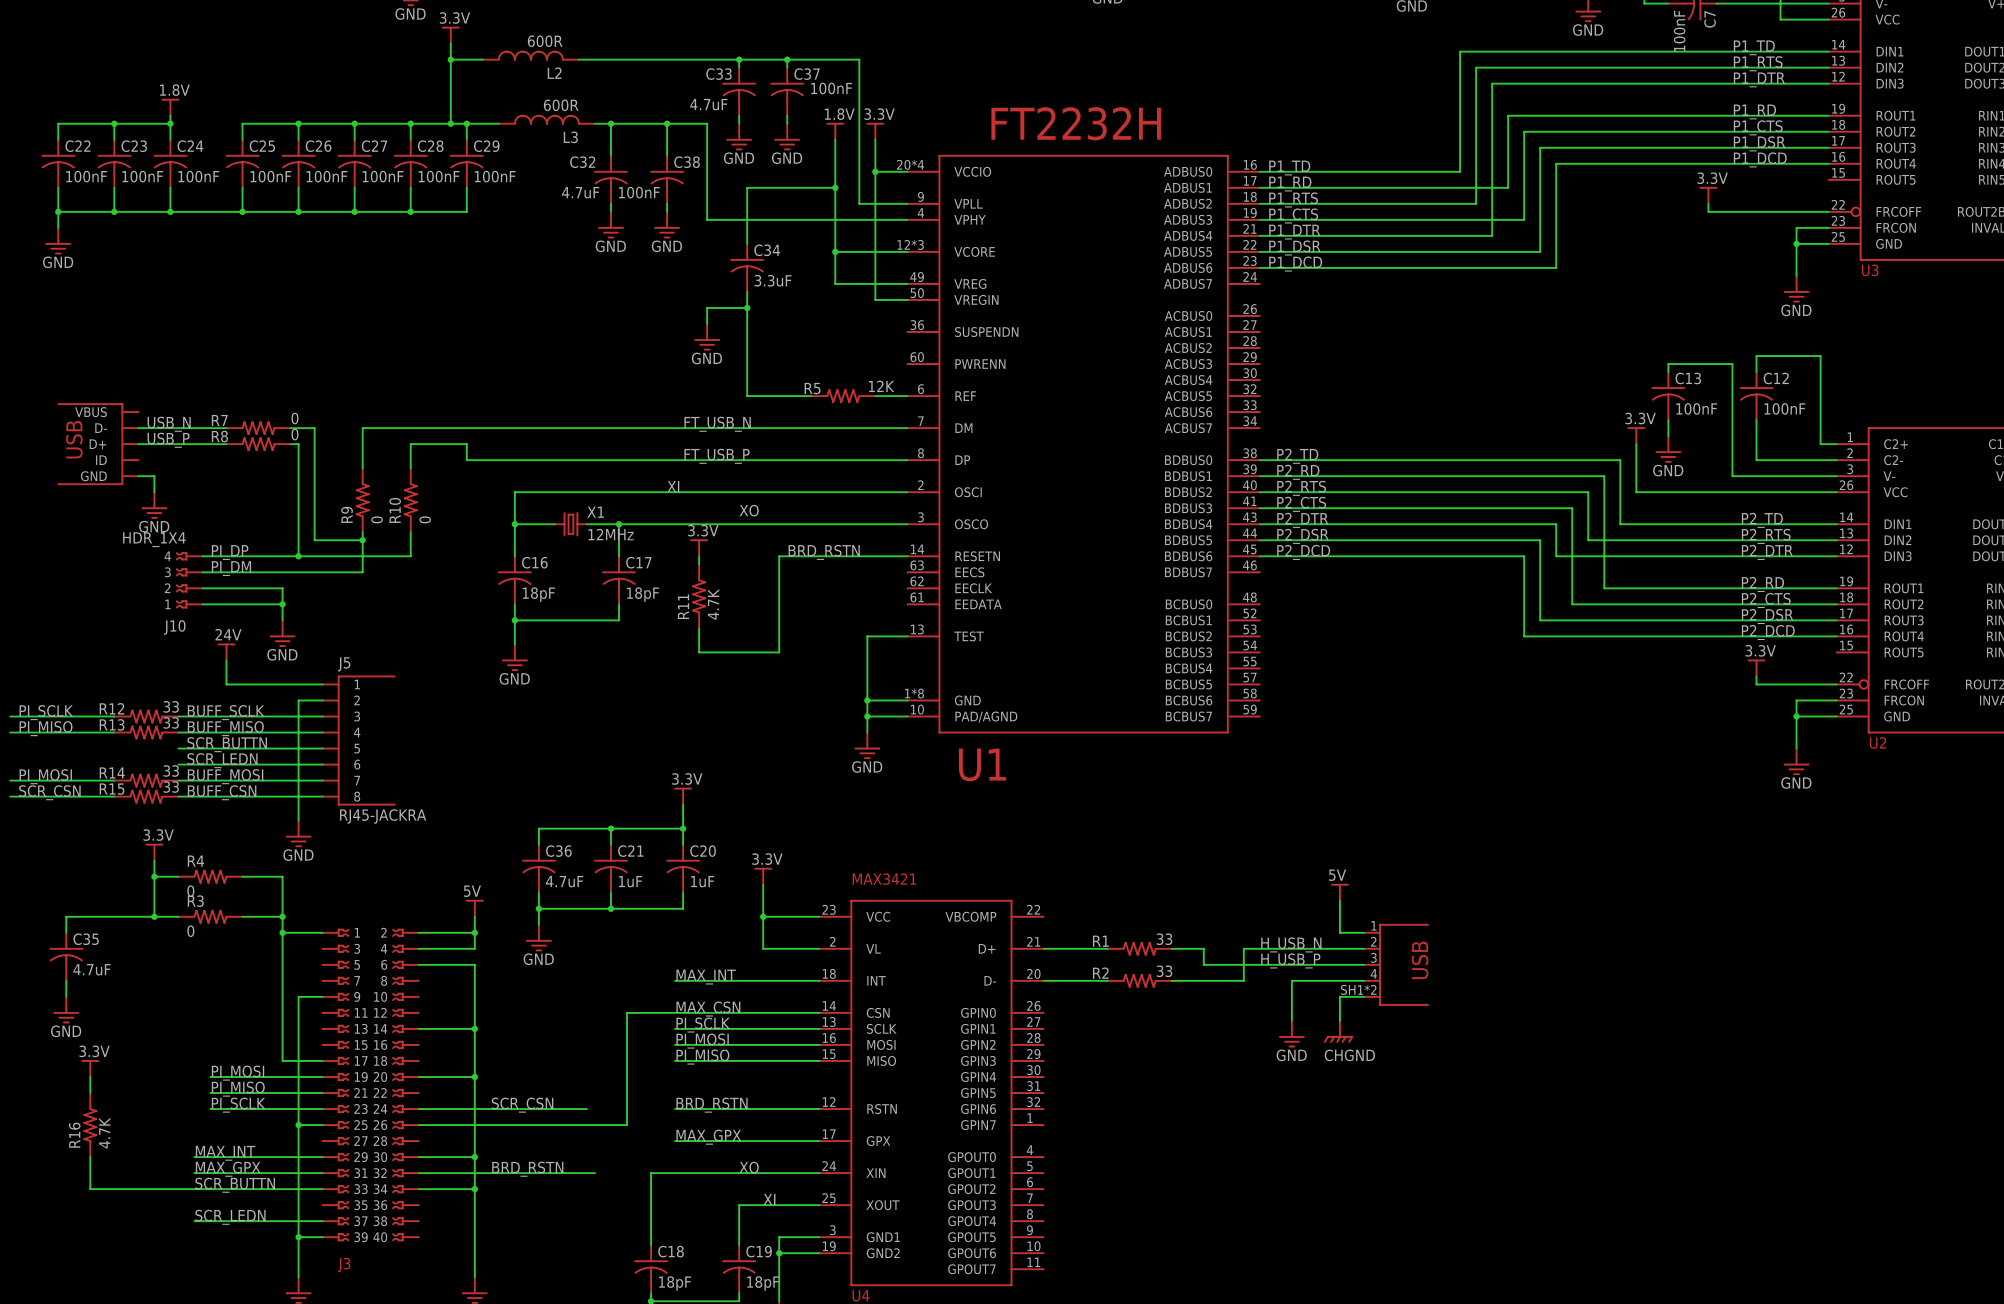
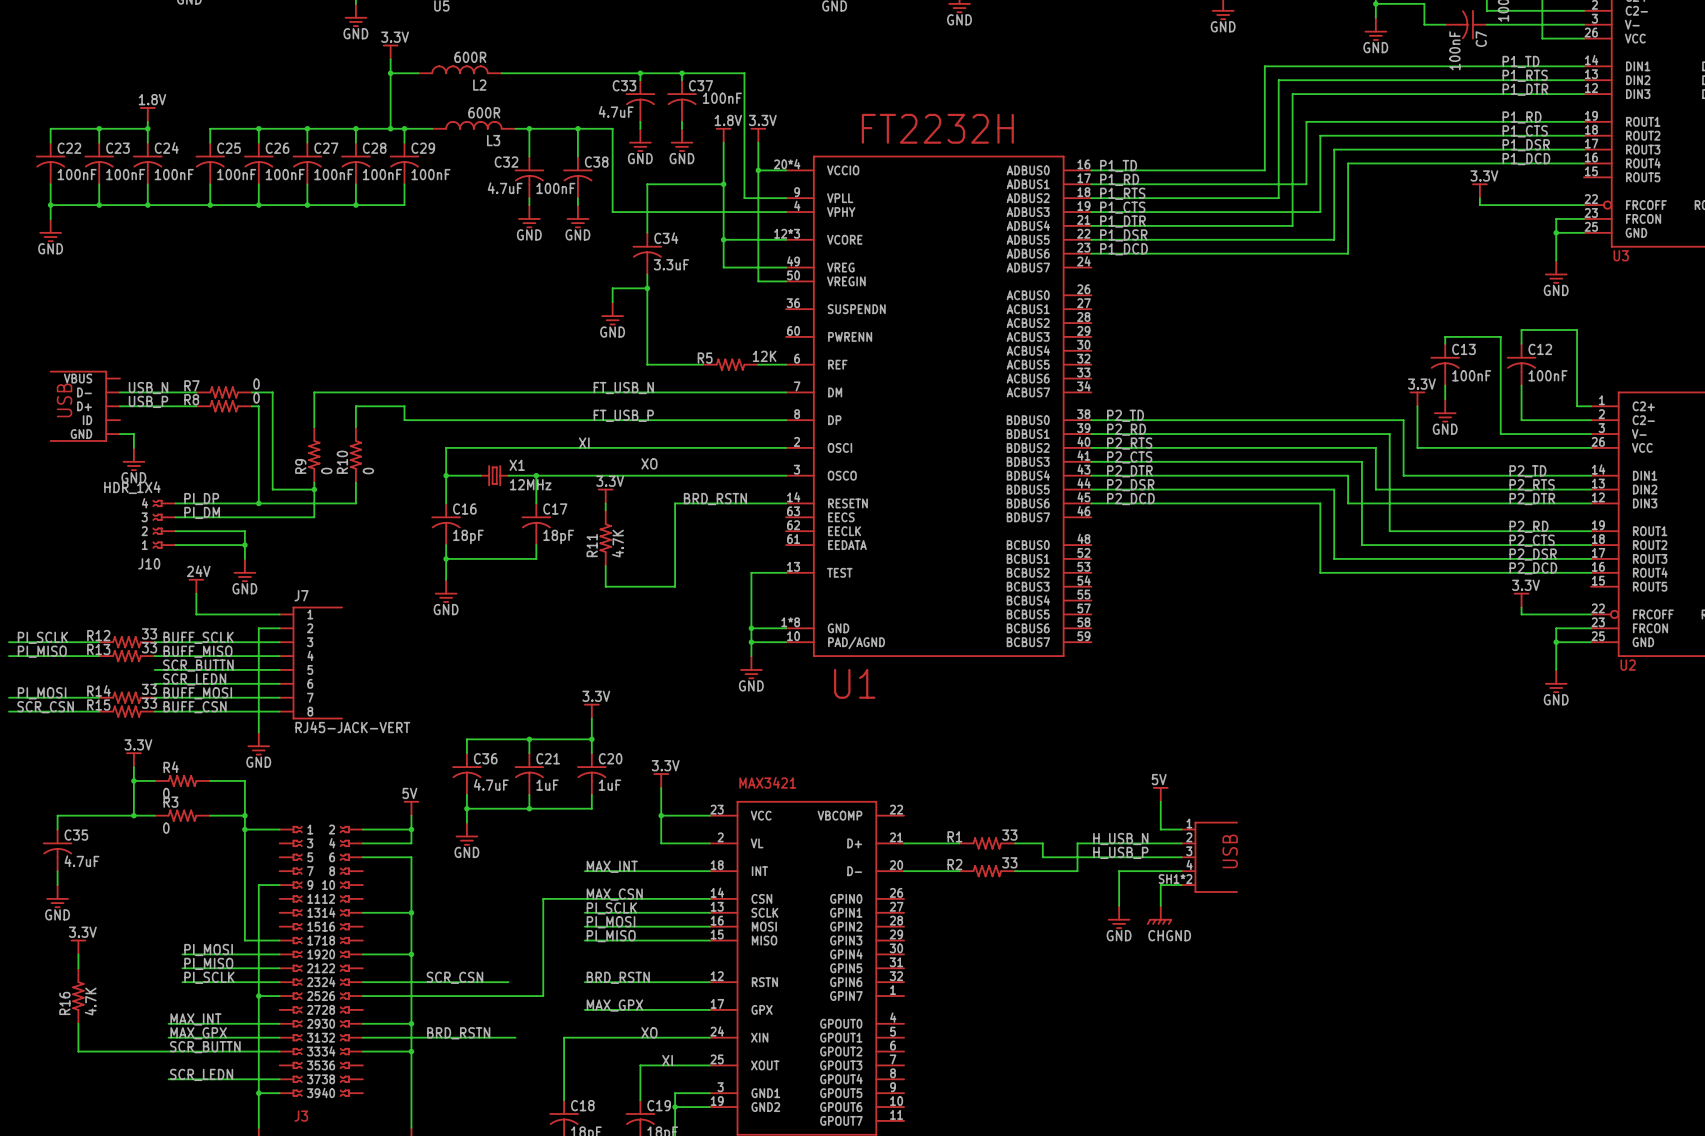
J5 name: J5 (344, 664) -> J7 (301, 595)
J5 value: RJ45-JACKRA (383, 816) -> RJ45-JACK-VERT (352, 727)

